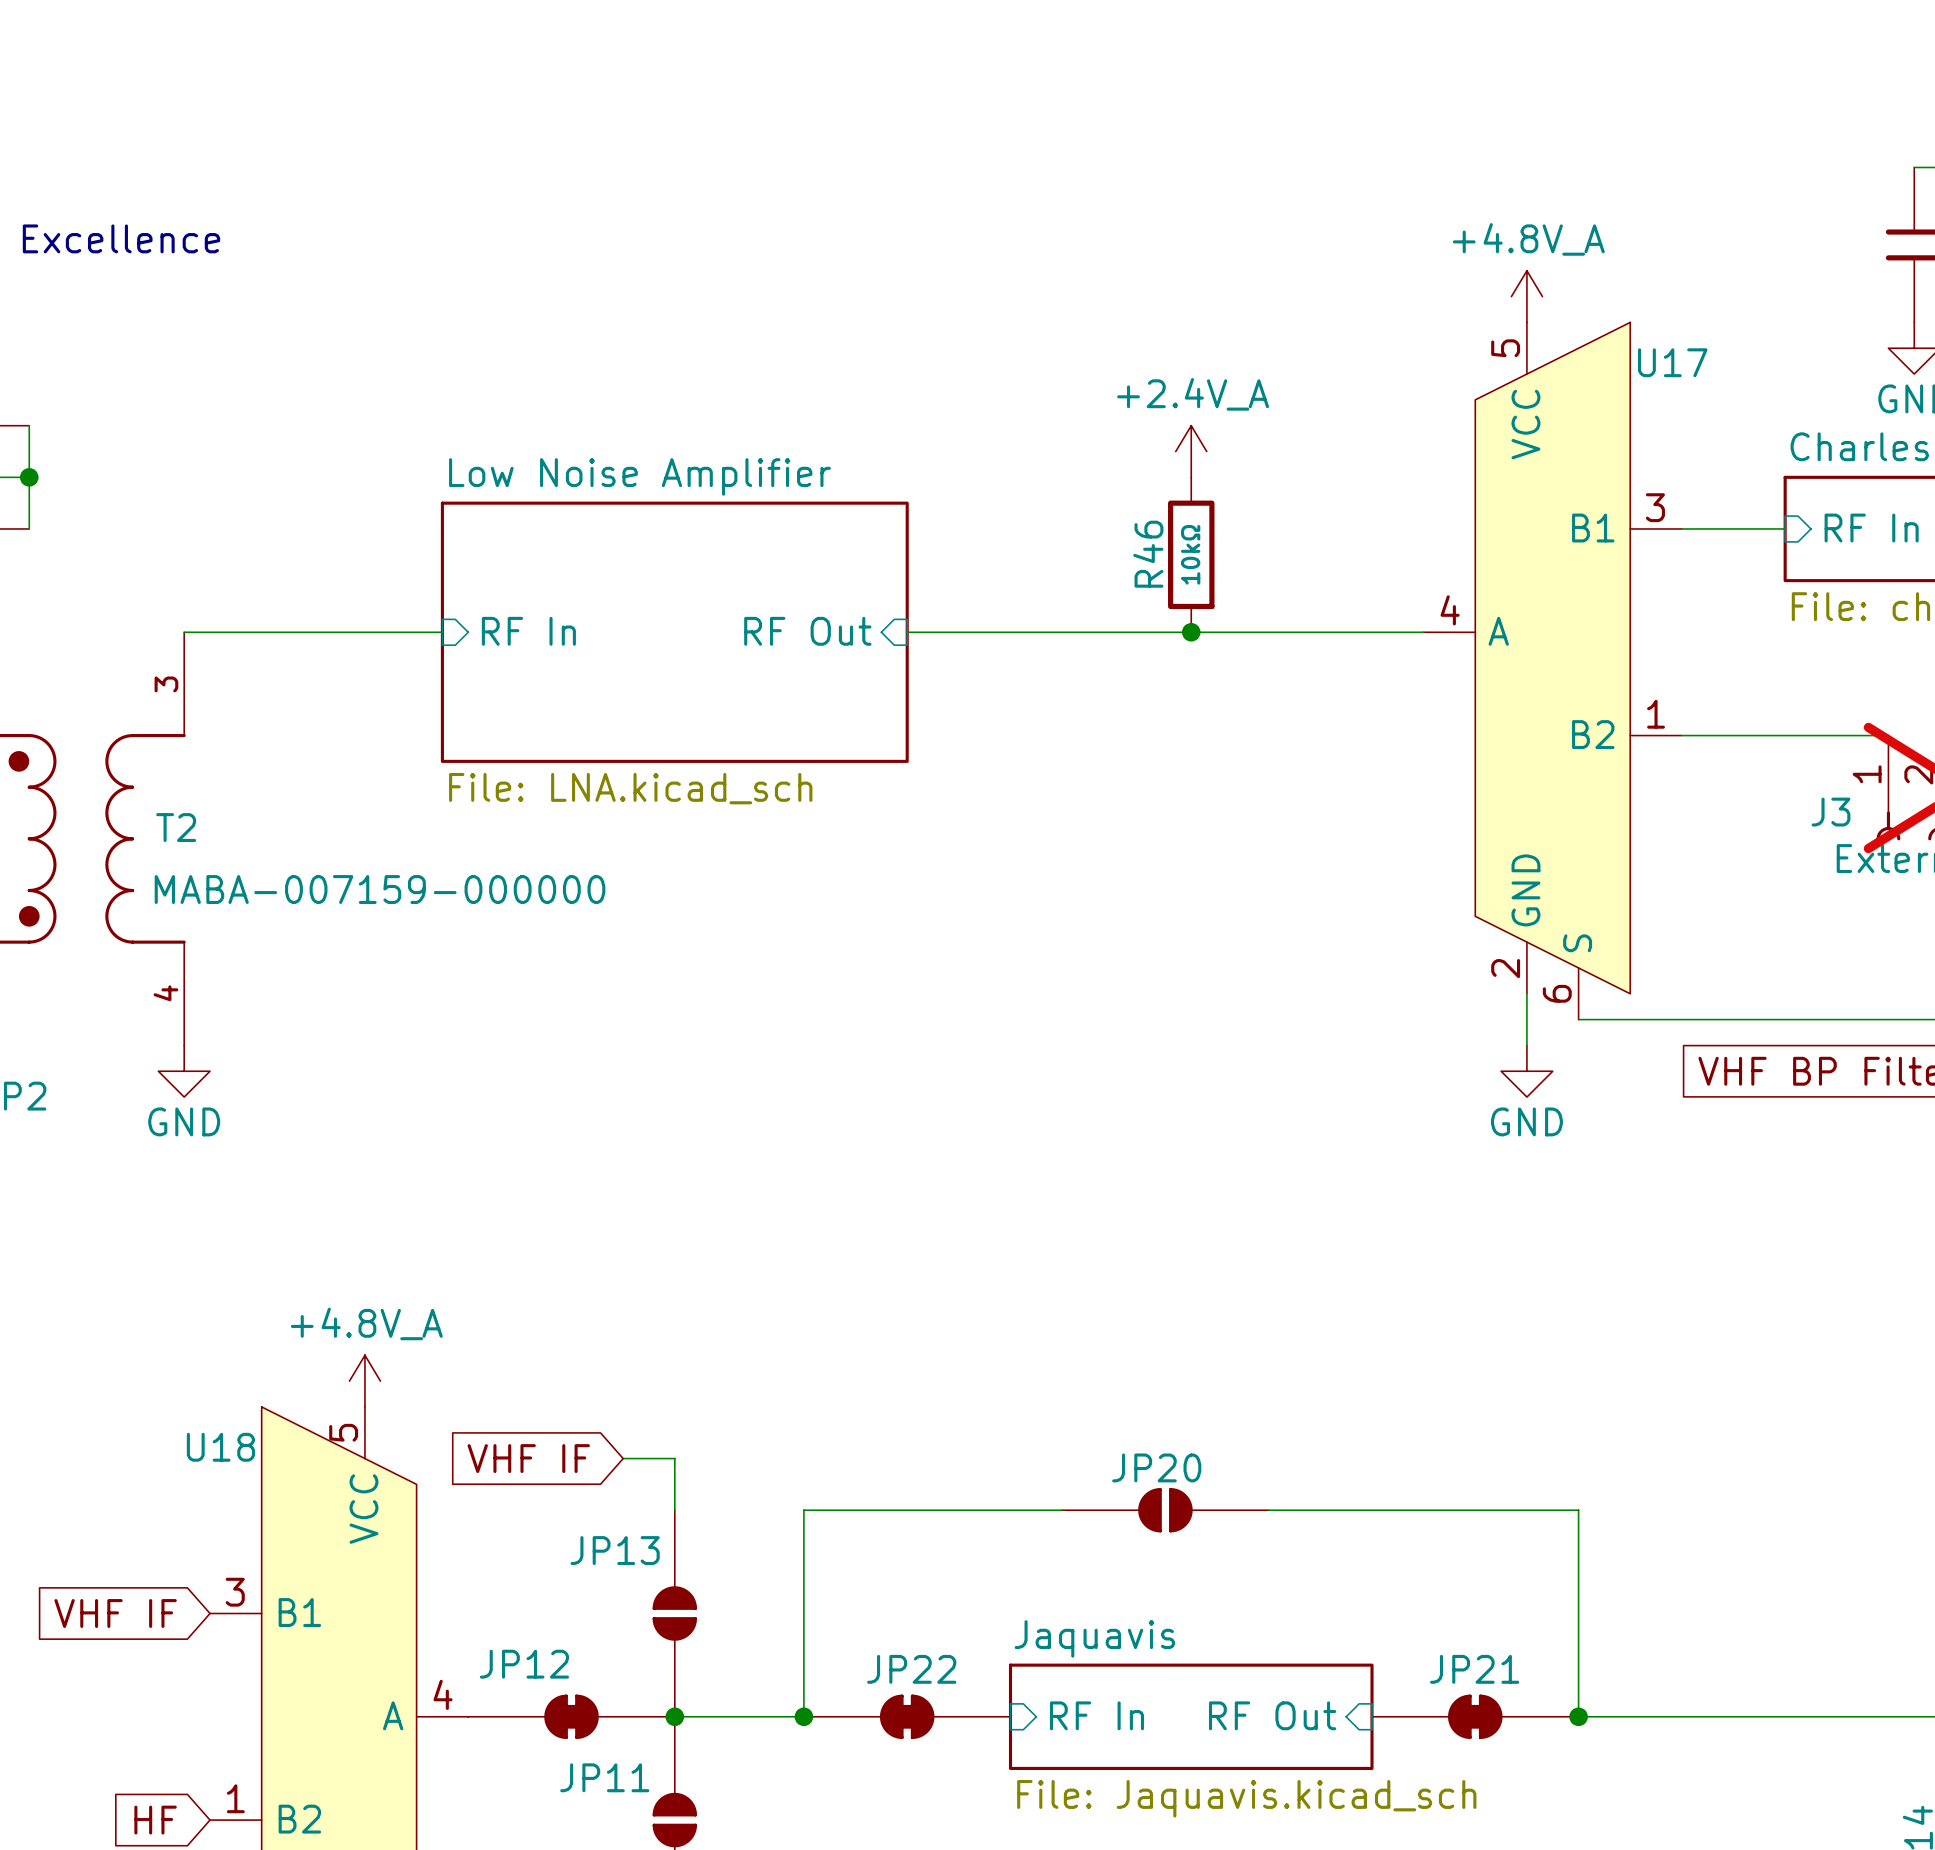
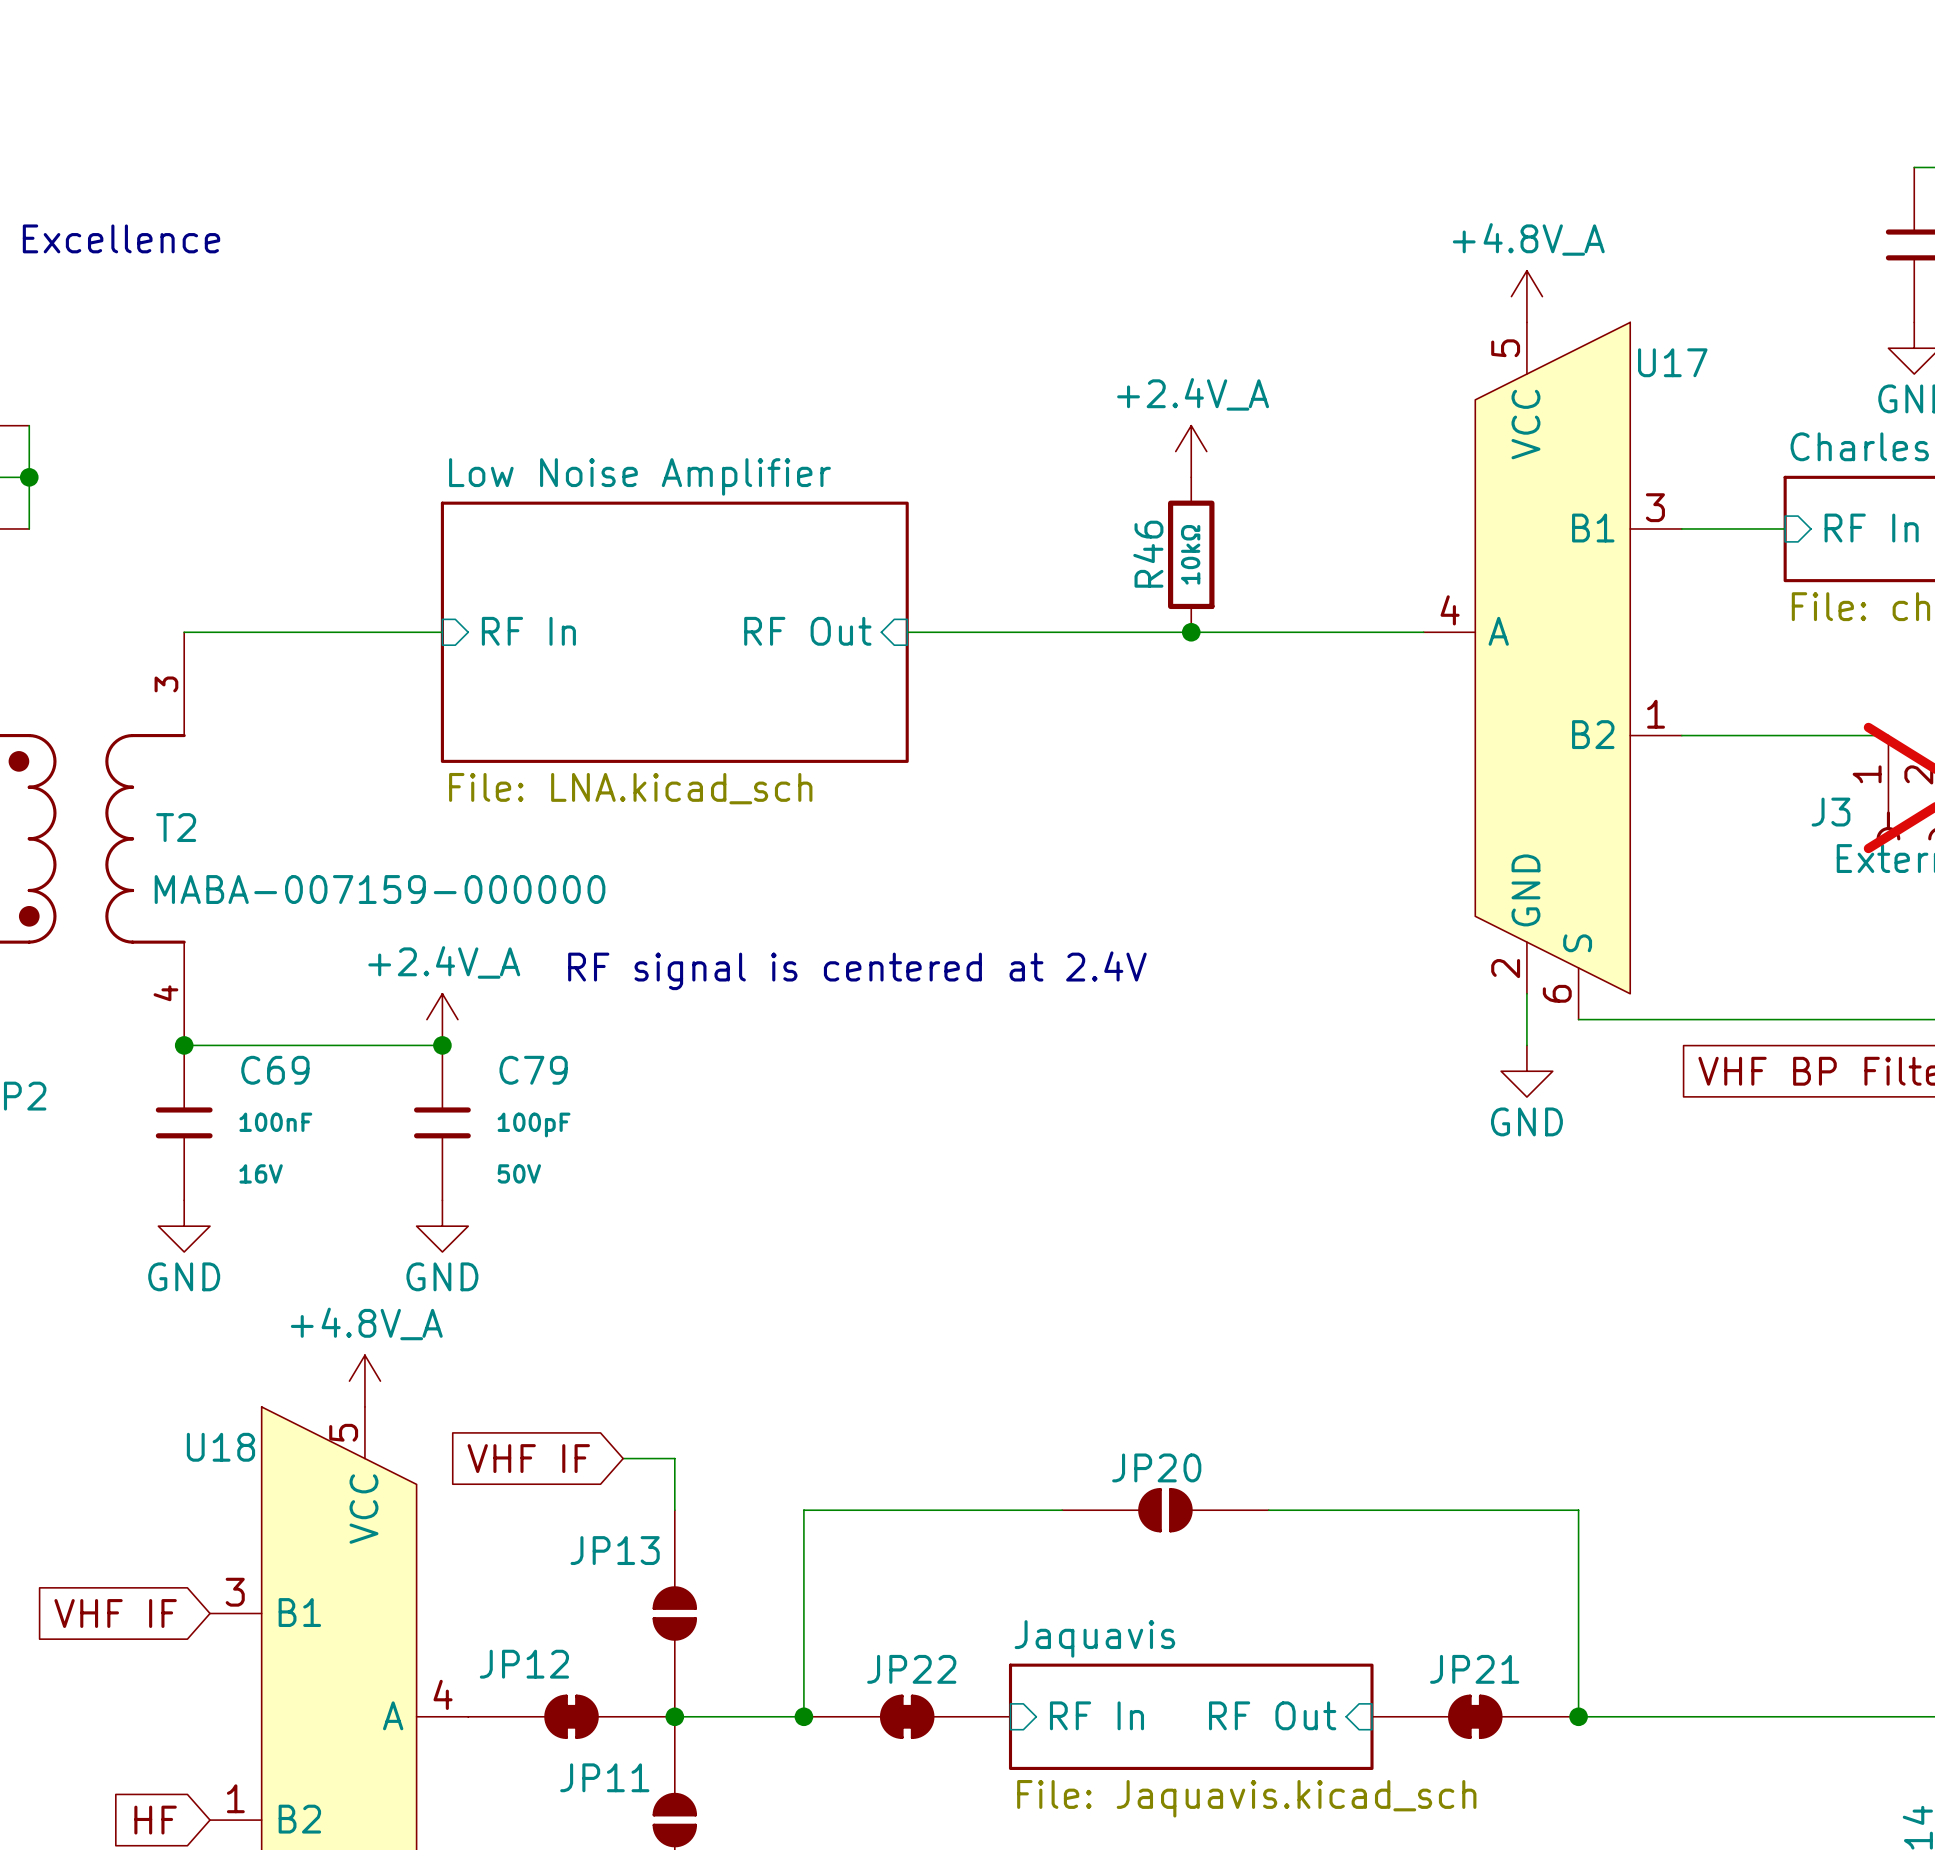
text: none -> RF signal is centered at 2.4V (857, 970)
power symbol: none -> +2.4V_A (442, 1019)
wire: none -> (184, 1045) (442, 1045)
junction: none -> (184, 1045)
junction: none -> (442, 1045)
power symbol: GND (184, 1071) -> none
C69: none -> 100nF (184, 1122)
C79: none -> 100pF (442, 1122)
power symbol: none -> GND (184, 1226)
power symbol: none -> GND (442, 1226)

